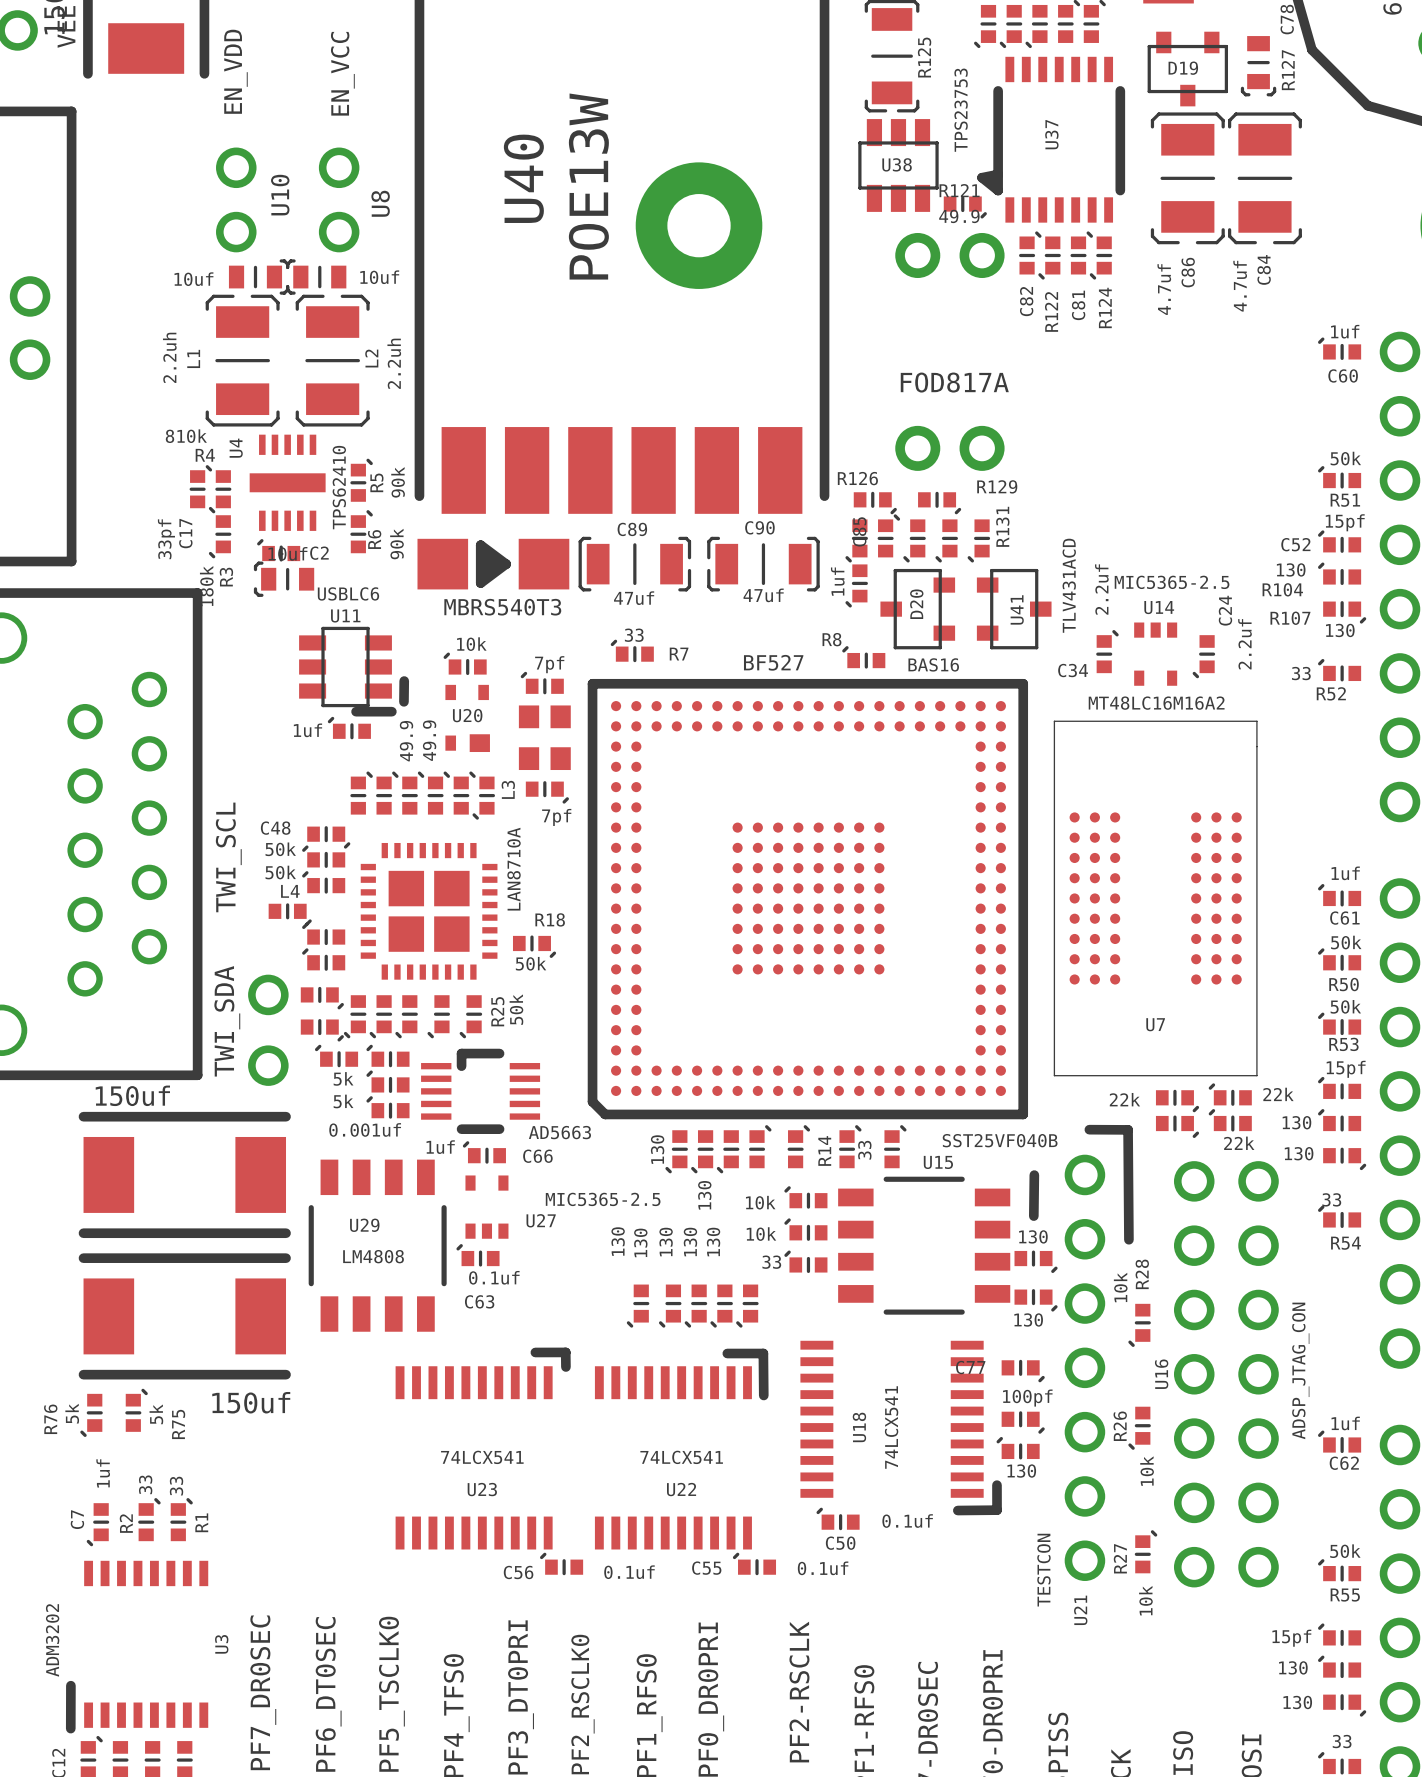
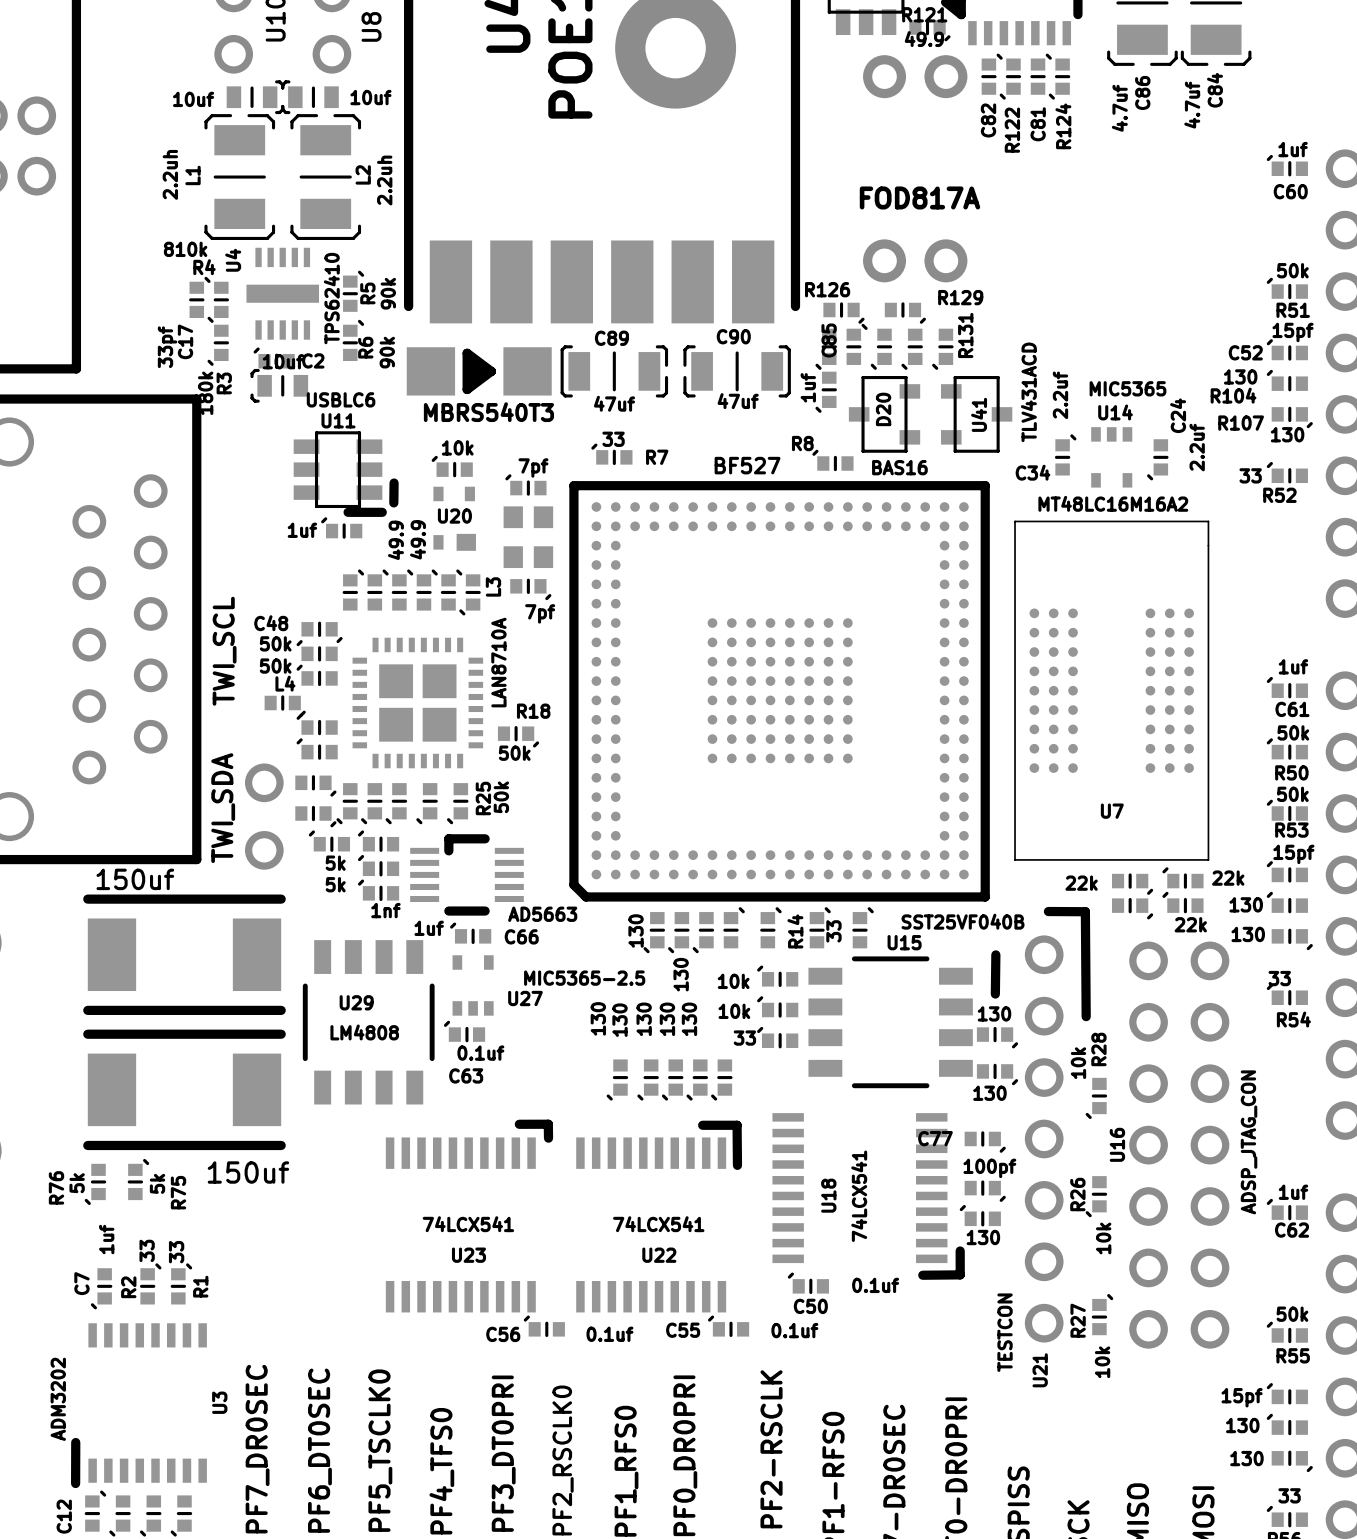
U14 value: MIC5365-2.5 (1172, 582) -> MIC5365 (1127, 388)
part value: 0.001uf (365, 1129) -> 1nf (385, 910)

